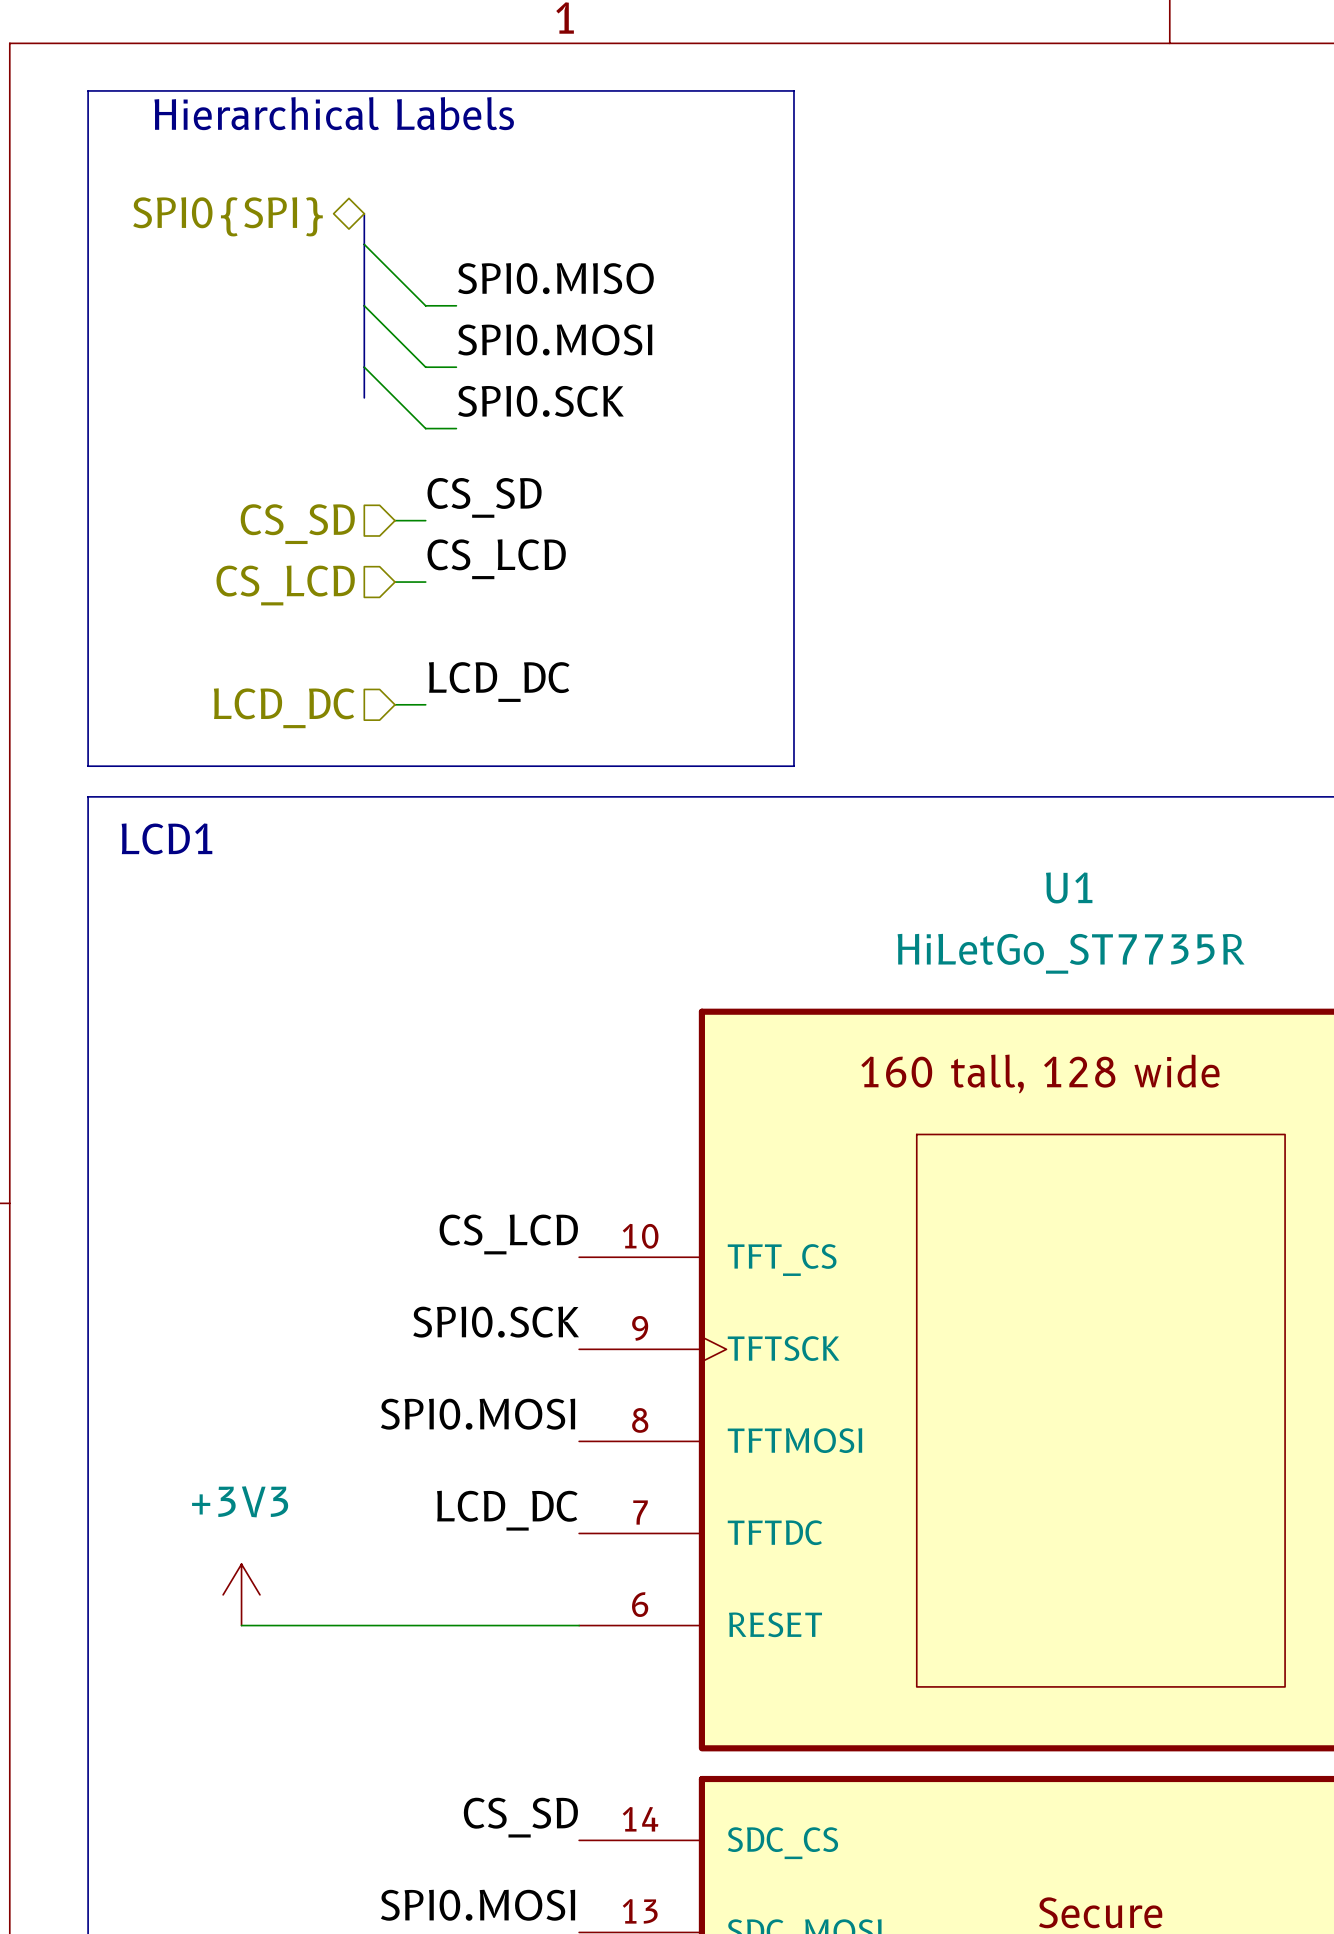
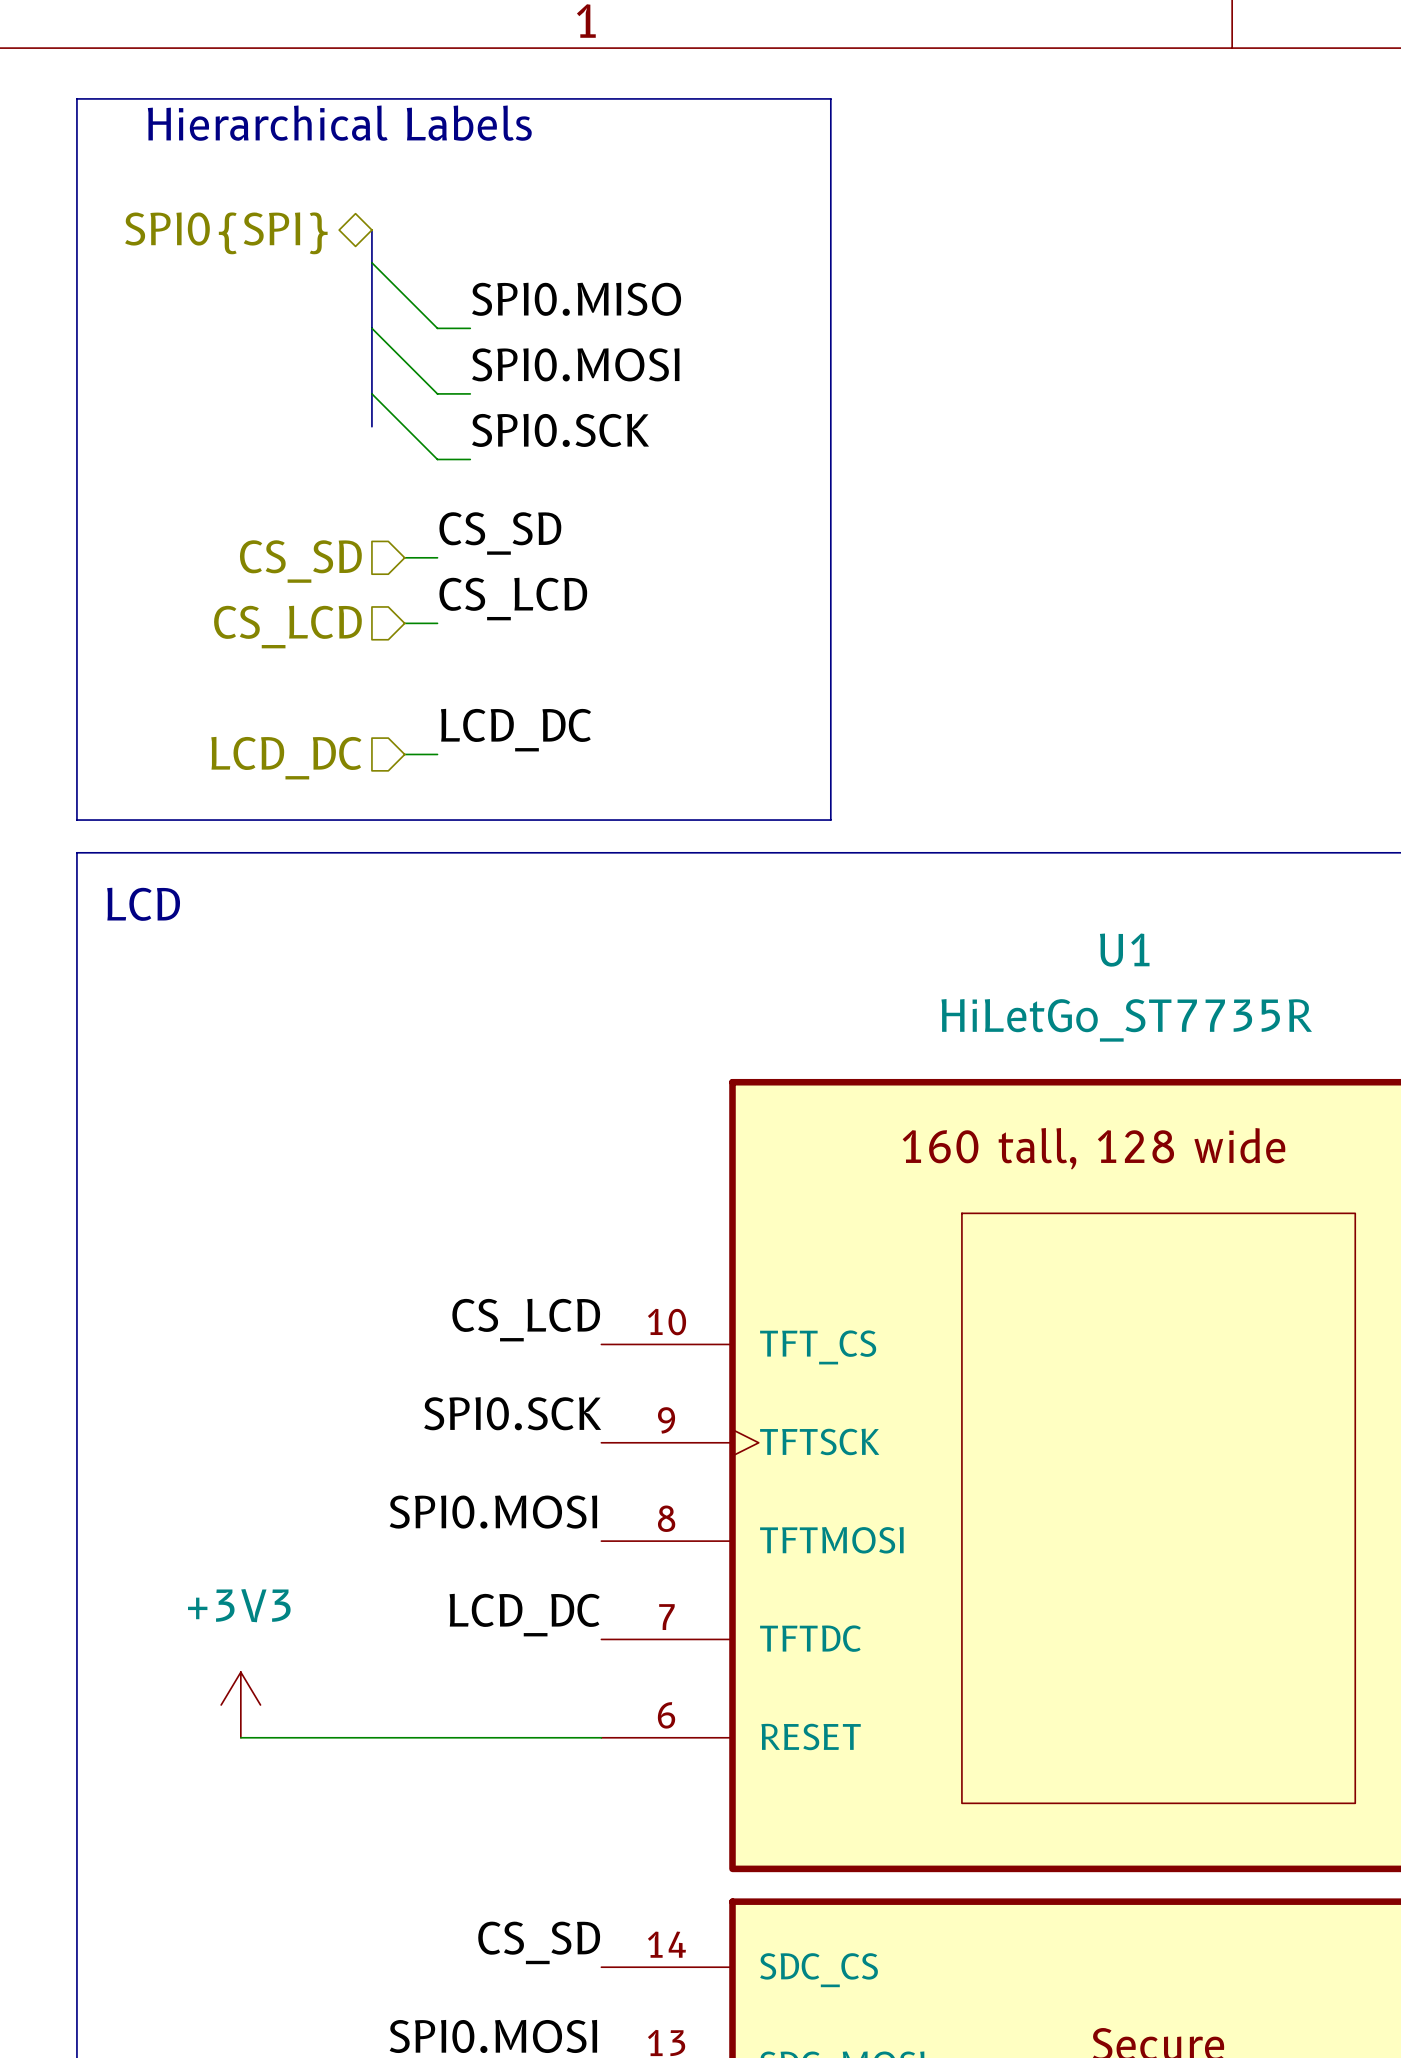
text: LCD1 (166, 838) -> LCD (143, 904)

